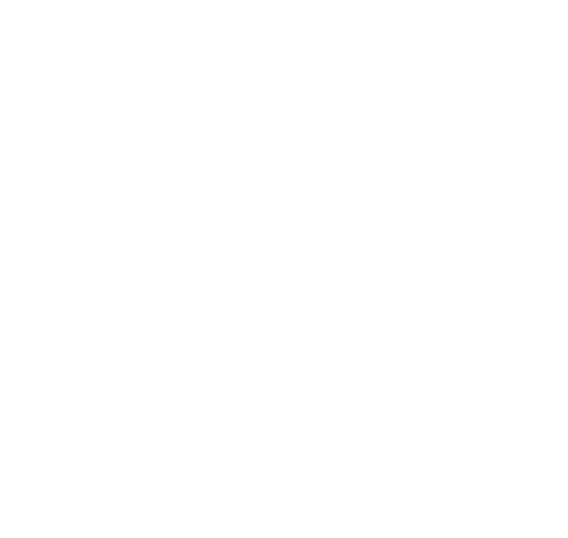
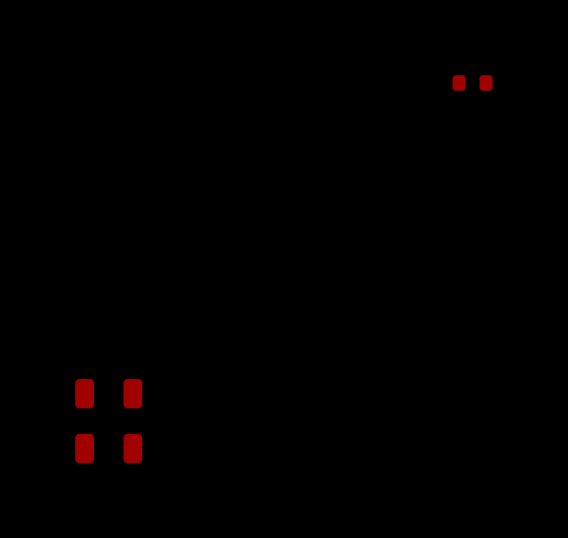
part: none -> (472, 82)
part: none -> (108, 393)
part: none -> (108, 448)

